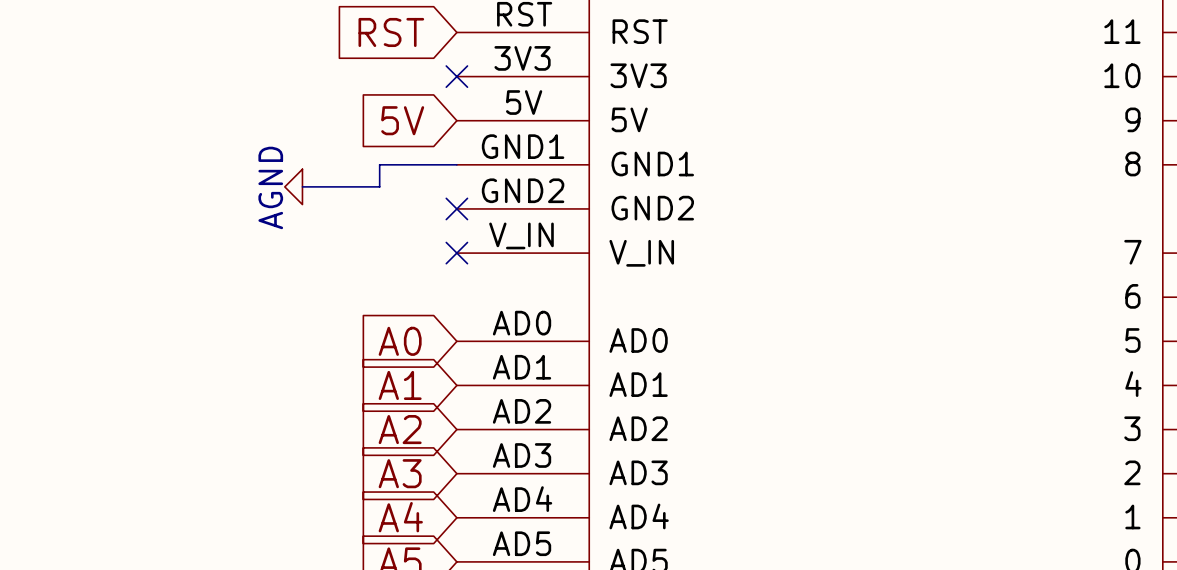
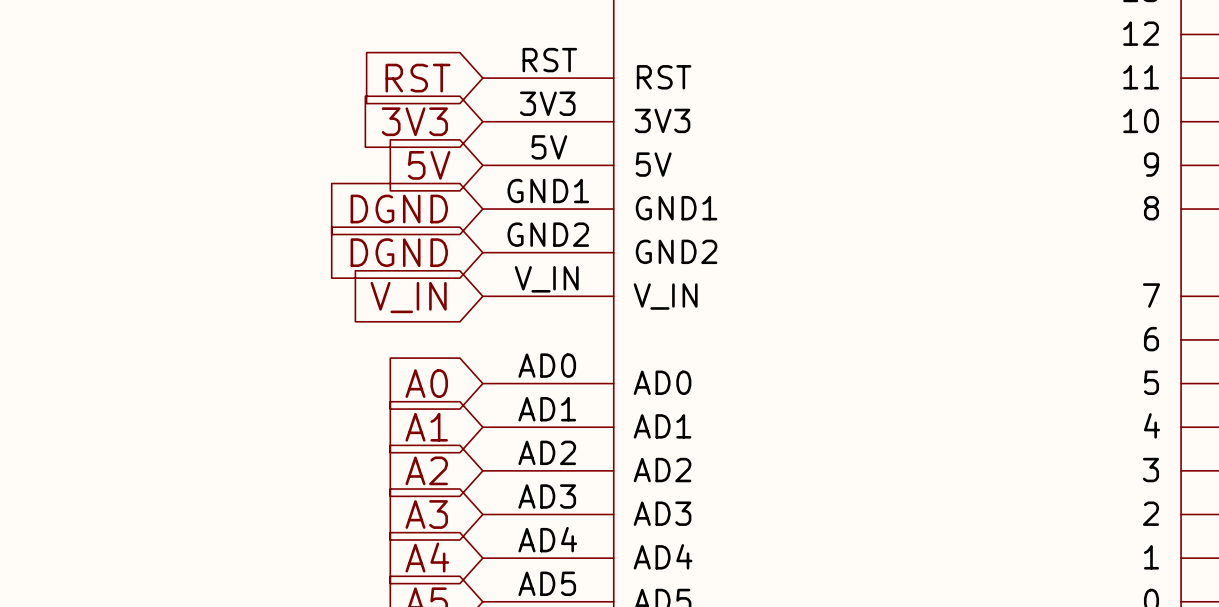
global label: none -> 3V3 (414, 121)
no-connect mark: (456, 76) -> none
global label: none -> DGND (399, 209)
wire: (456, 164) (379, 164) (379, 186) (302, 186) -> none
power symbol: AGND (293, 186) -> none
global label: none -> DGND (399, 252)
no-connect mark: (456, 208) -> none
no-connect mark: (456, 253) -> none
global label: none -> V_IN (408, 297)

